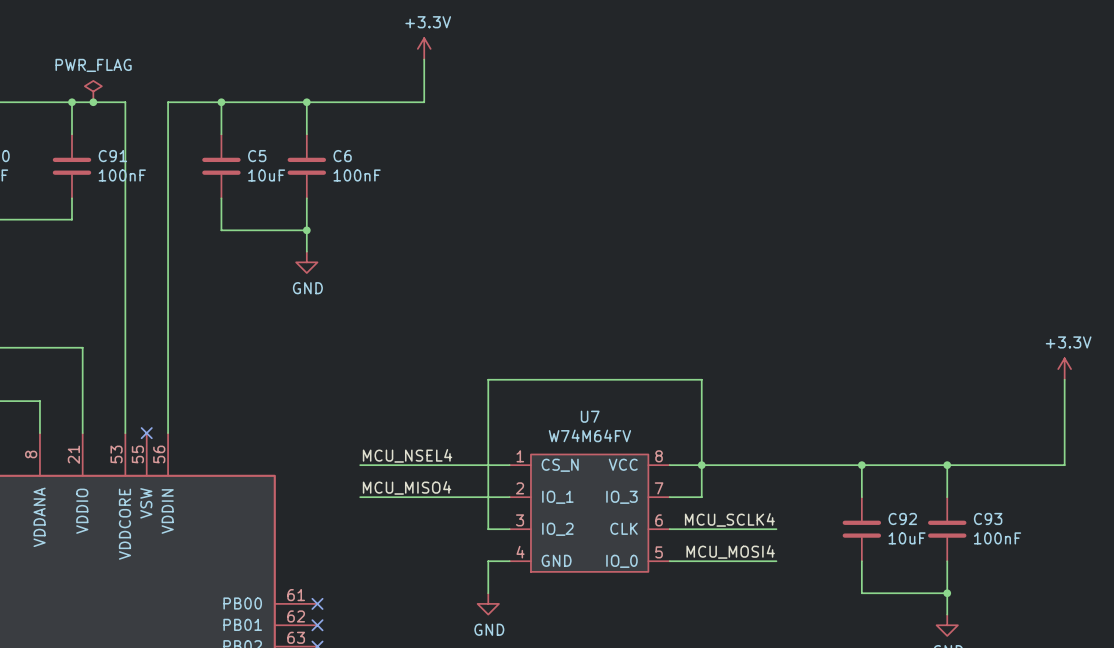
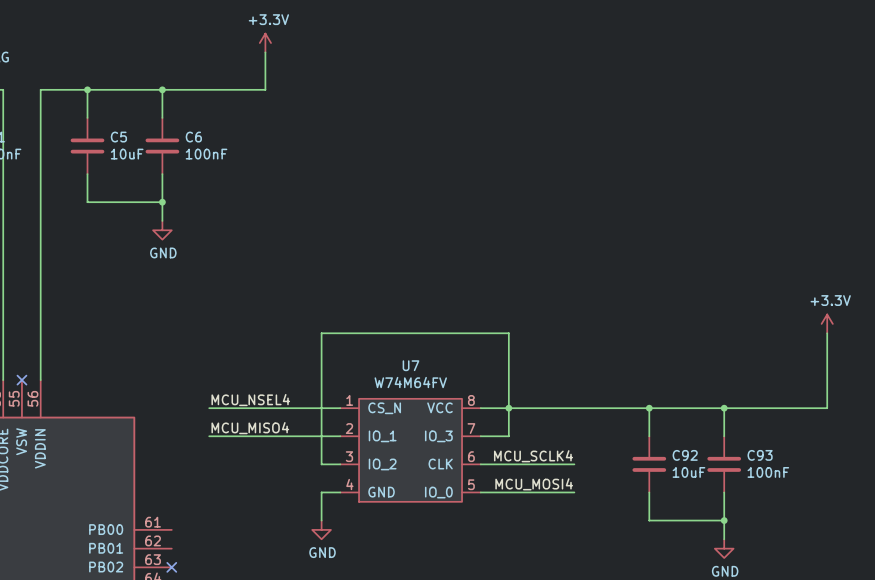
no-connect mark: (317, 603) -> none
no-connect mark: (317, 625) -> none

